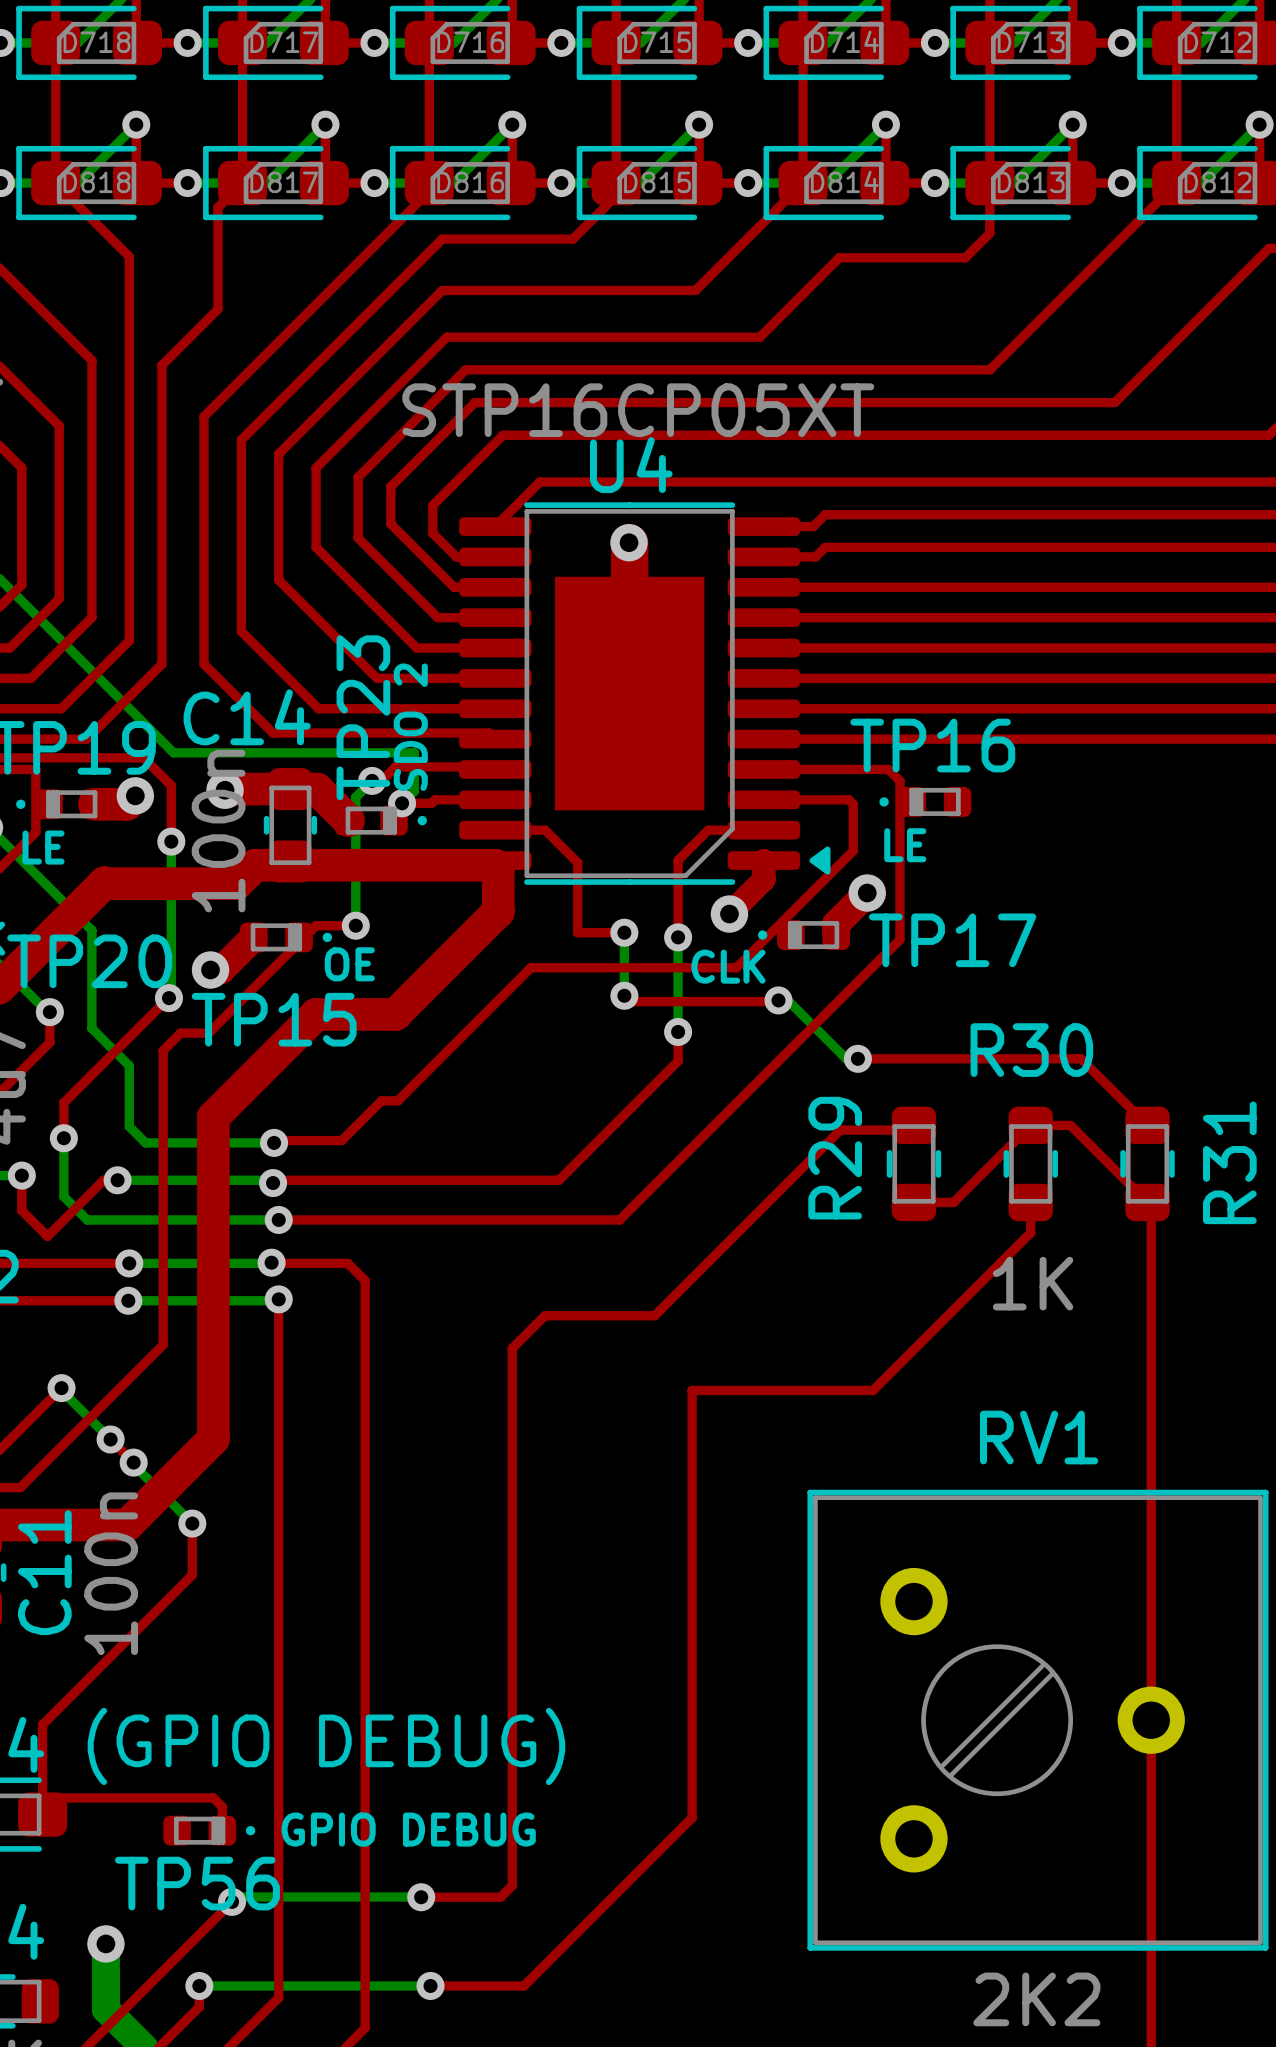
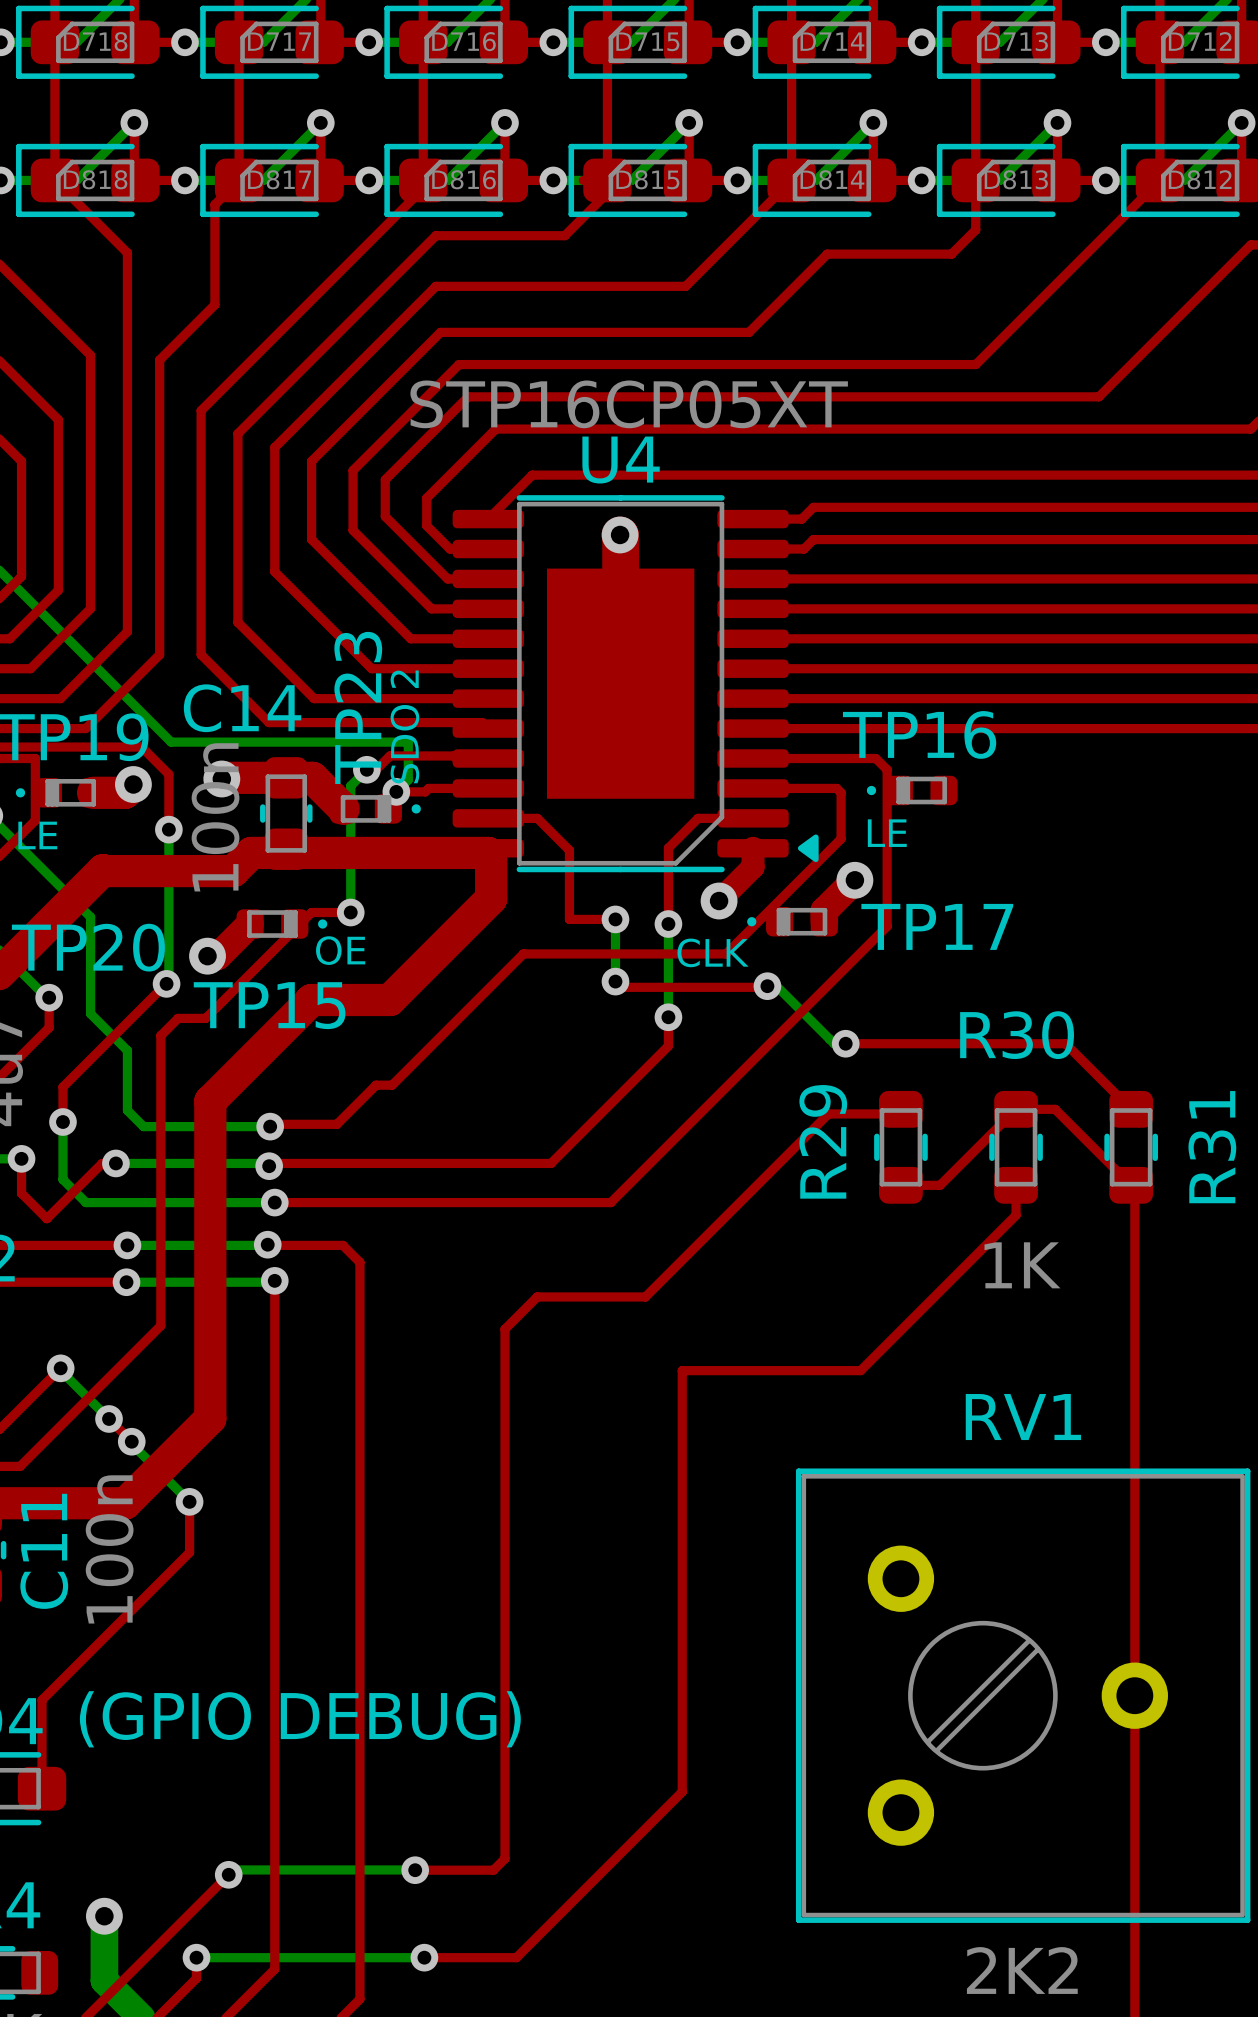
top track: (42, 1814) (59, 1797) (213, 1797) (222, 1806) (222, 1830) -> none
text: GPIO DEBUG (408, 1829) -> none
TP56: (209, 1830) -> none

